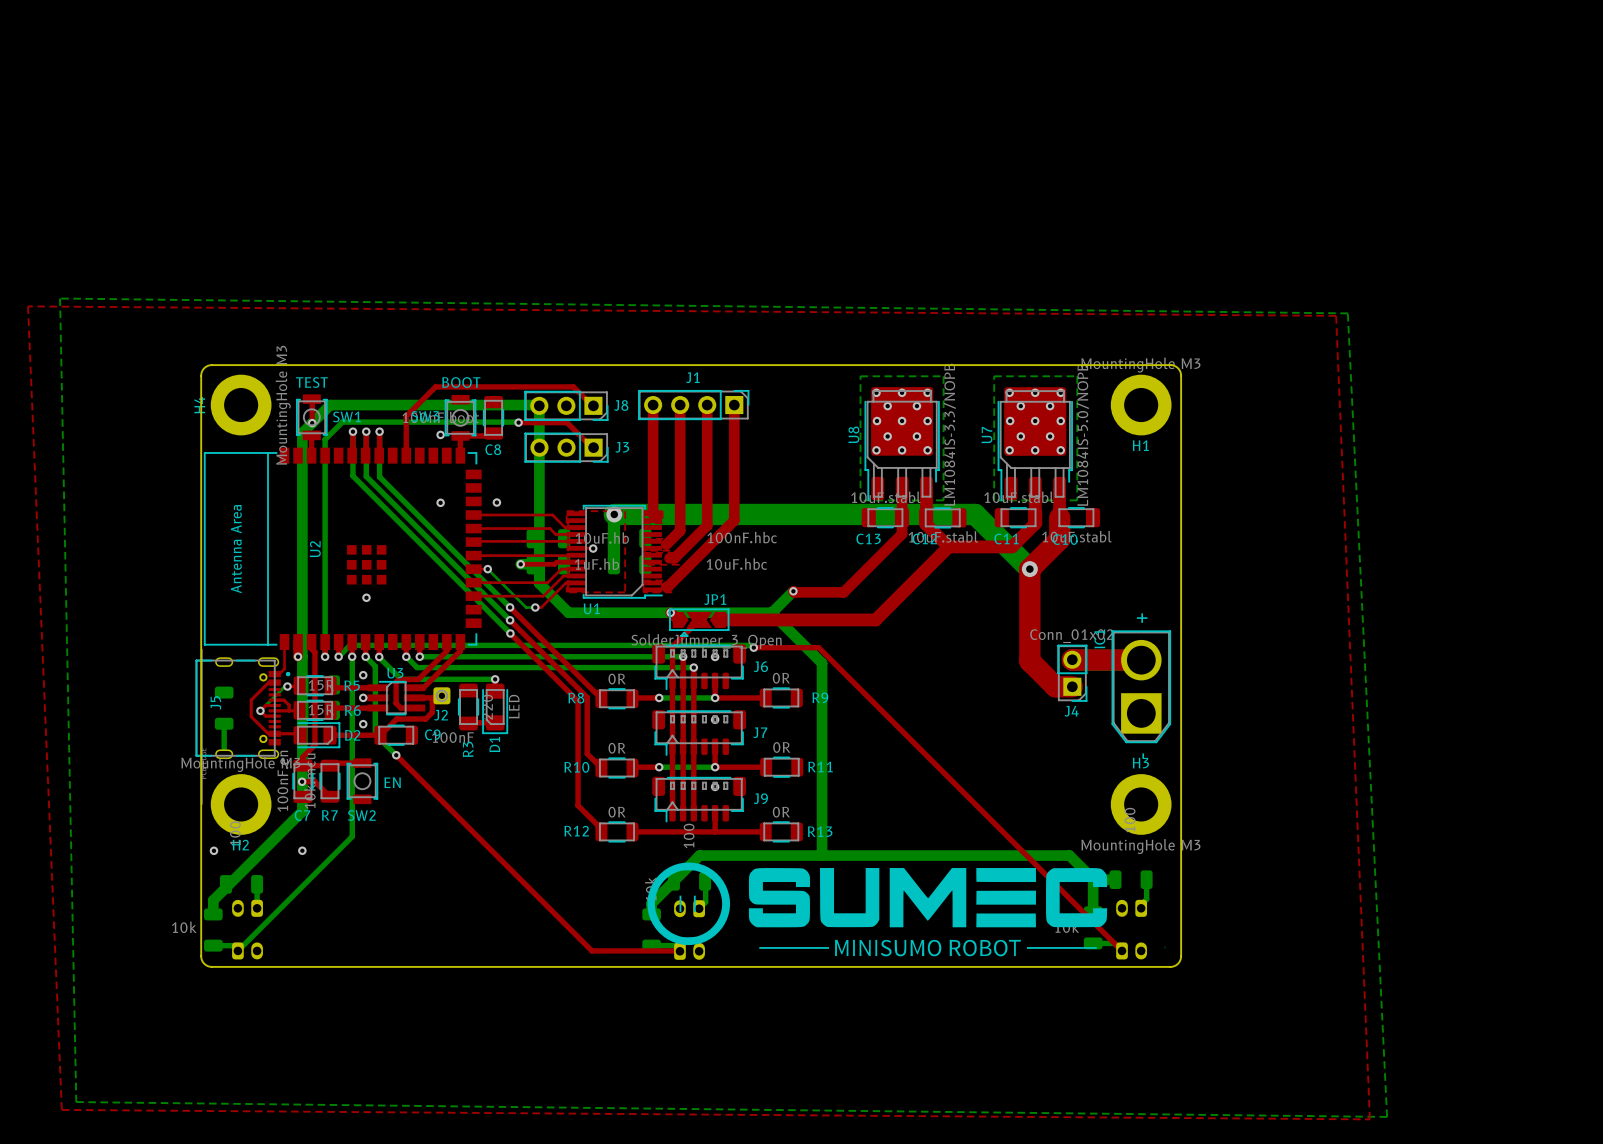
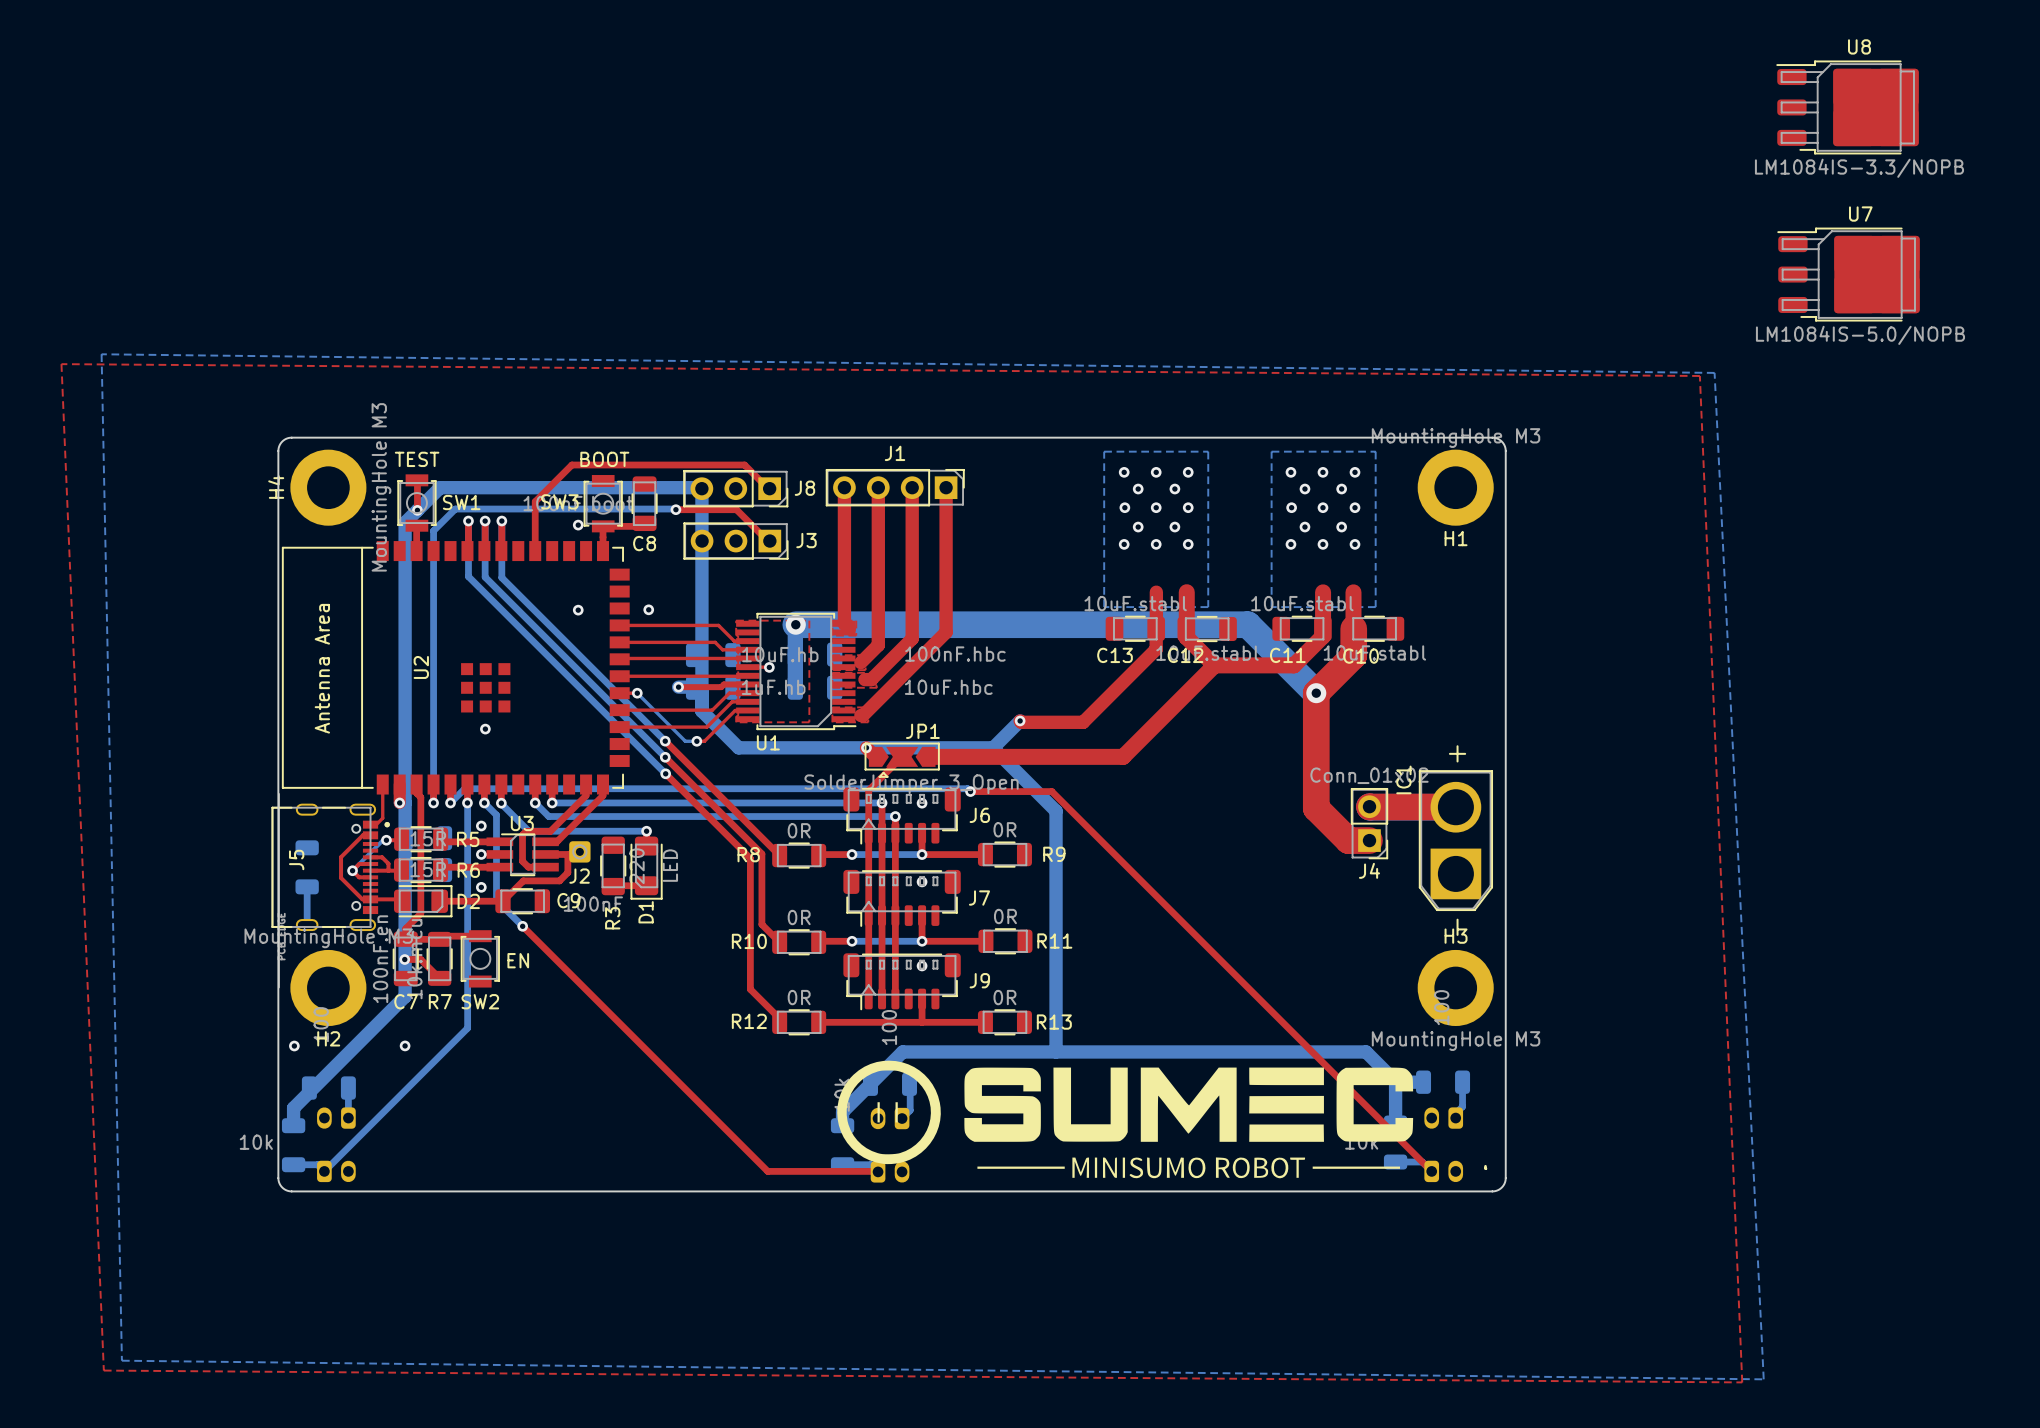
U8 rotation: 0° (902, 444) -> 90° clockwise (1847, 107)
U8 position: (902, 444) -> (1847, 107)
U7 rotation: 0° (1035, 444) -> 90° clockwise (1848, 274)
U7 position: (1035, 444) -> (1848, 274)

